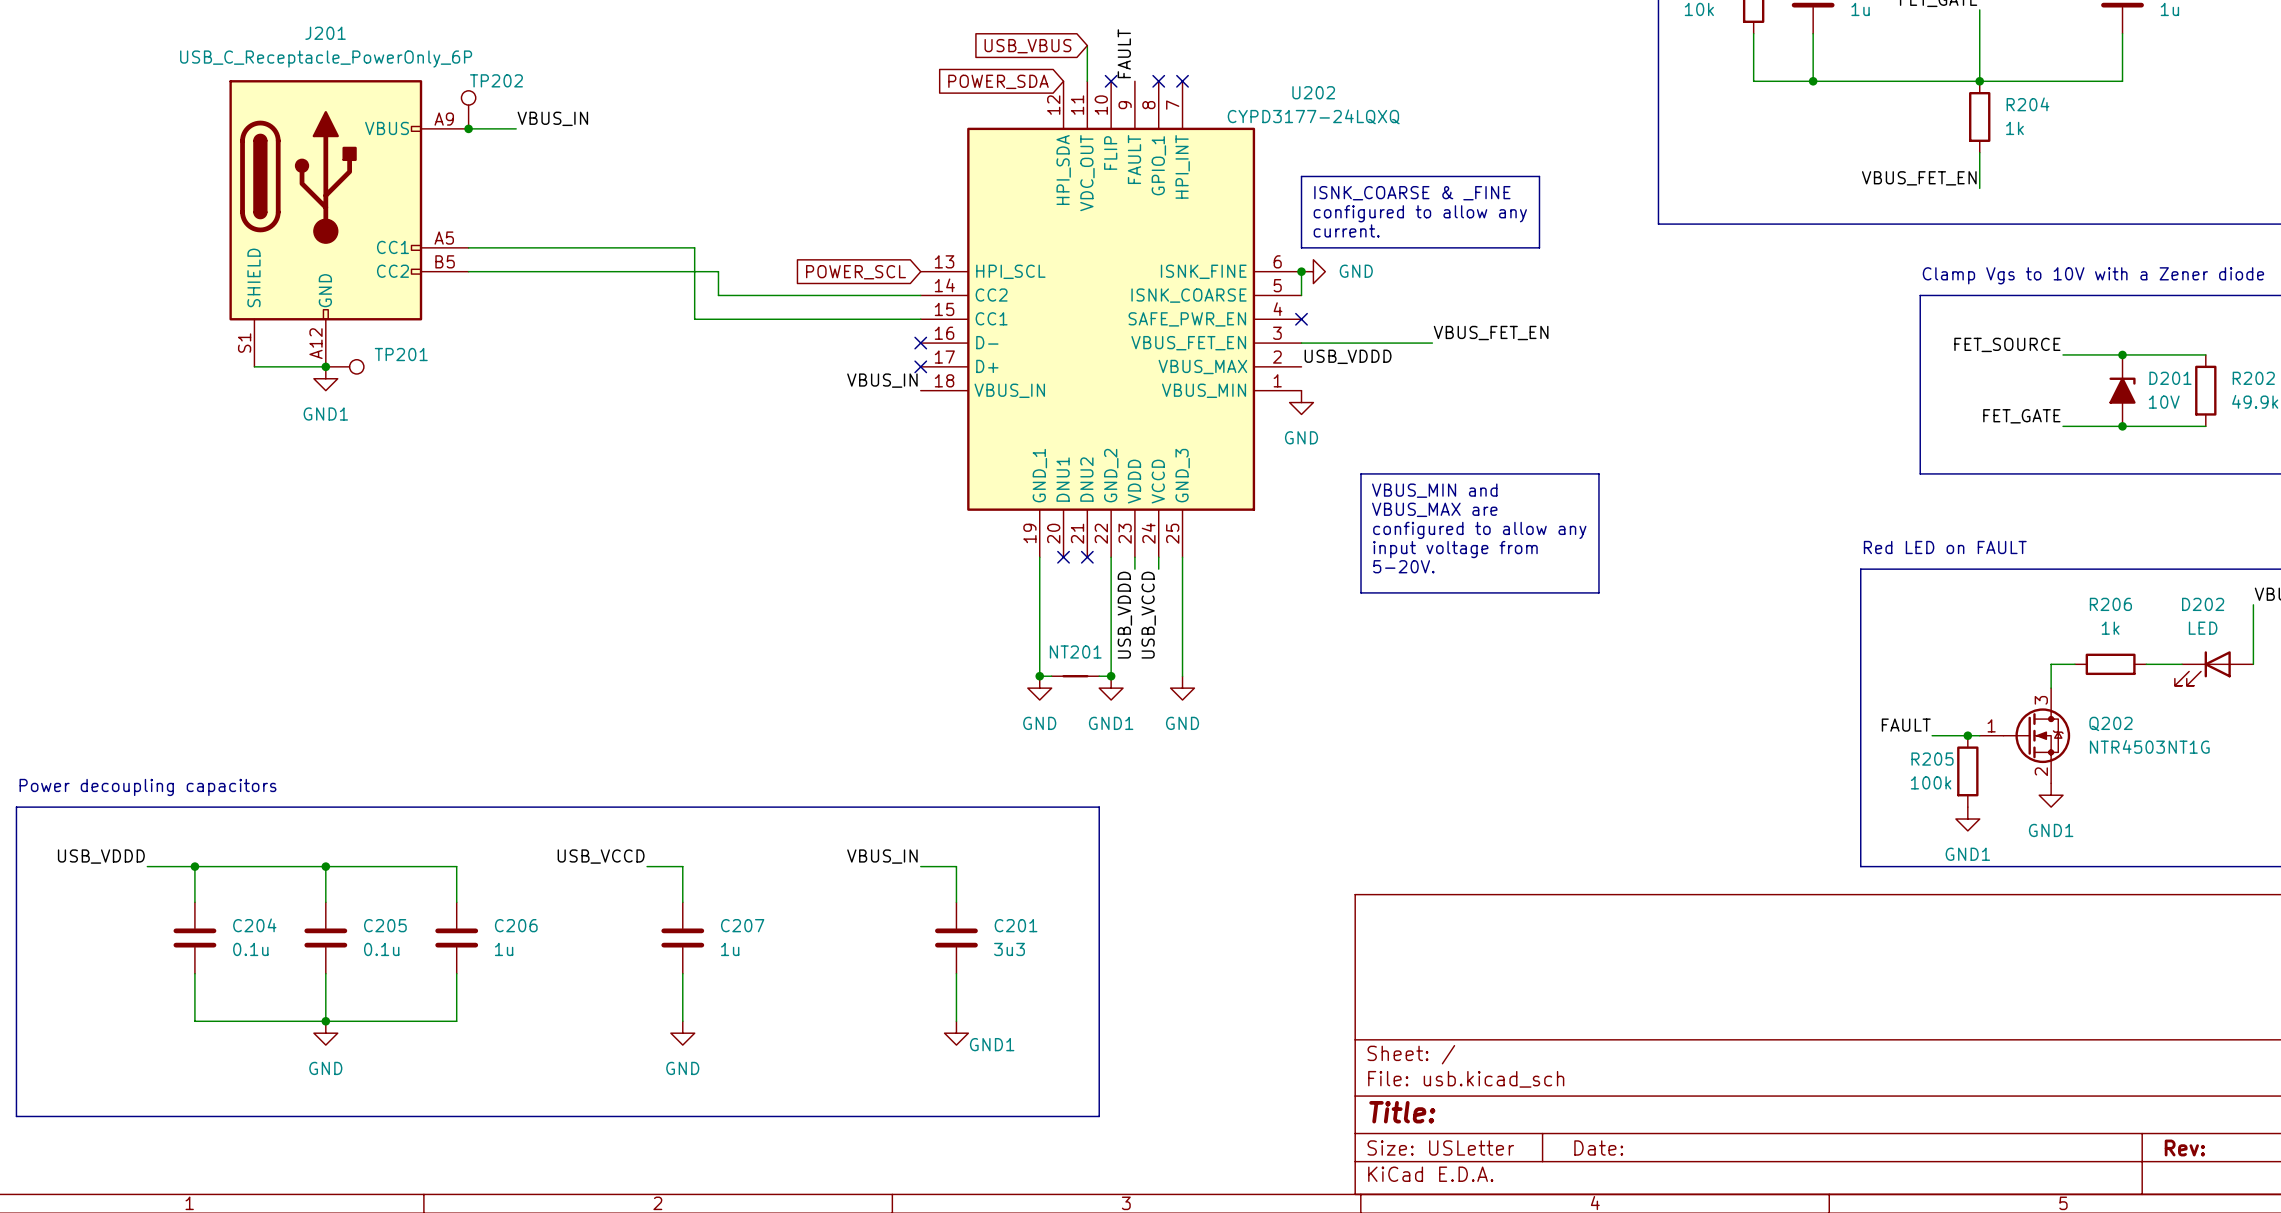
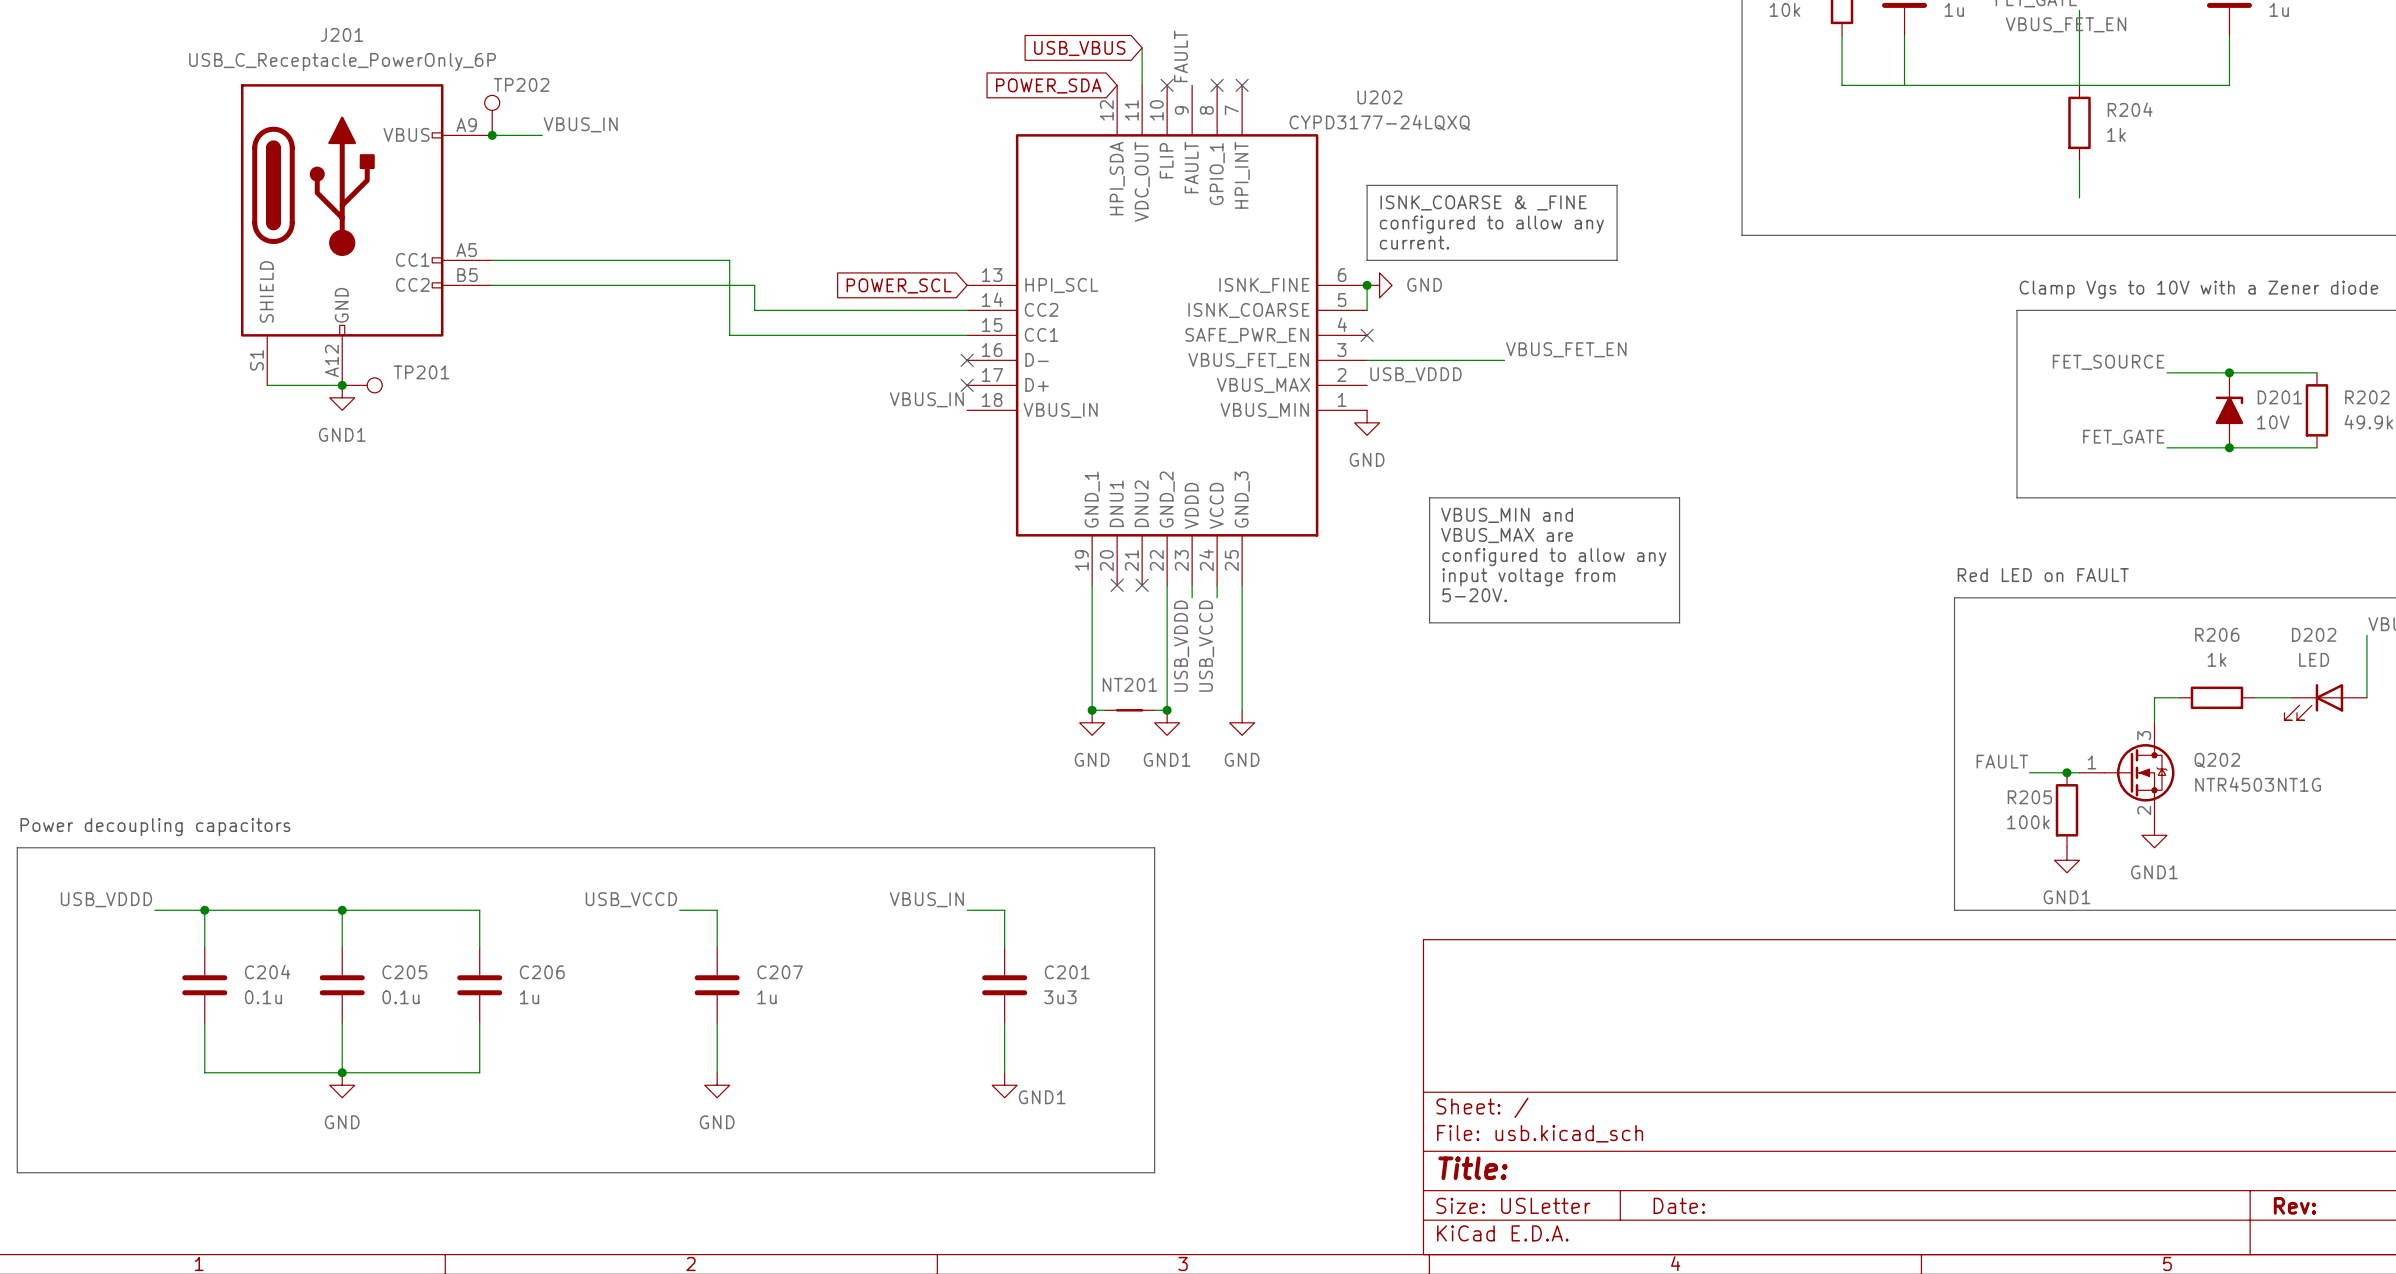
junction: (1813, 81) -> none
junction: (1979, 81) -> none
label position: VBUS_FET_EN (1919, 178) -> VBUS_FET_EN (2066, 24)

